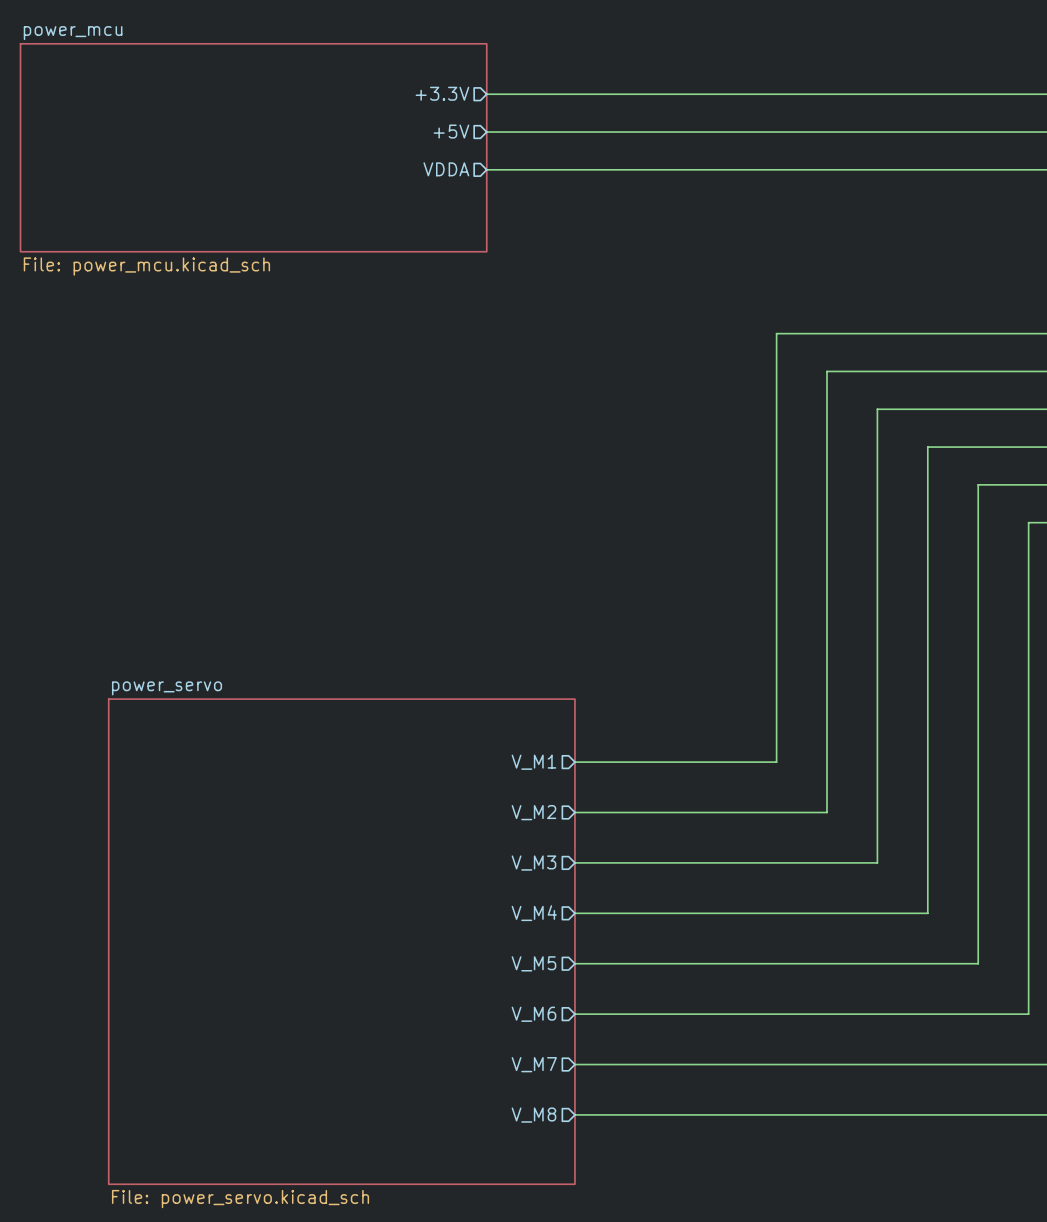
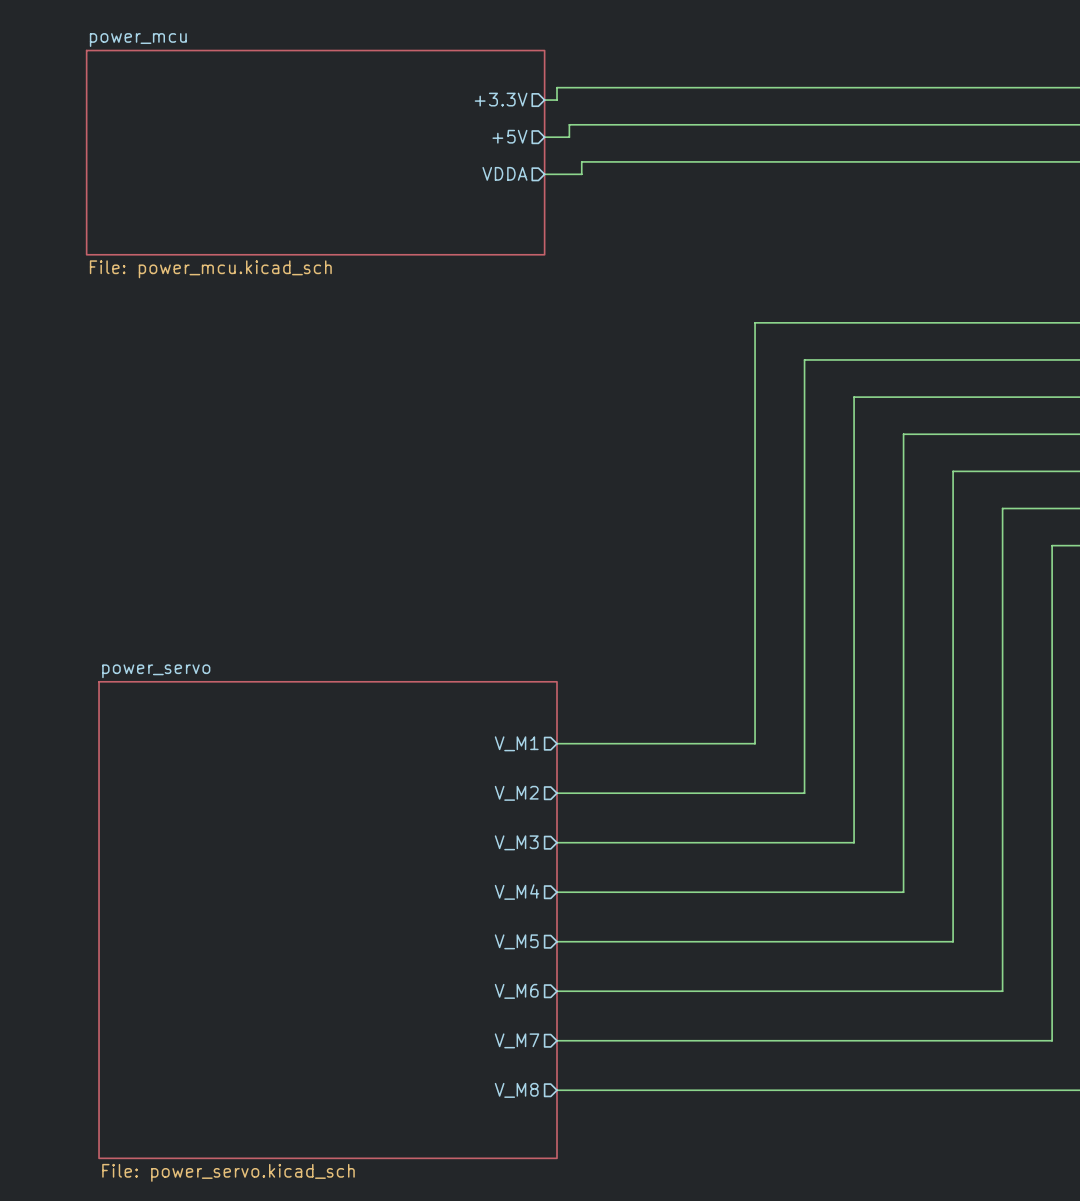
sheet pin position: +3.3V (442, 93) -> +3.3V (501, 99)
wire: (486, 94) (574, 94) -> (544, 100) (557, 100) (557, 87)
sheet pin position: +5V (451, 131) -> +5V (509, 136)
wire: (486, 132) (587, 132) -> (544, 137) (569, 137) (569, 124)
sheet power_mcu position: (253, 147) -> (315, 152)
sheet pin position: VDDA (446, 169) -> VDDA (504, 173)
wire: (486, 169) (600, 169) -> (544, 174) (581, 174) (581, 161)

